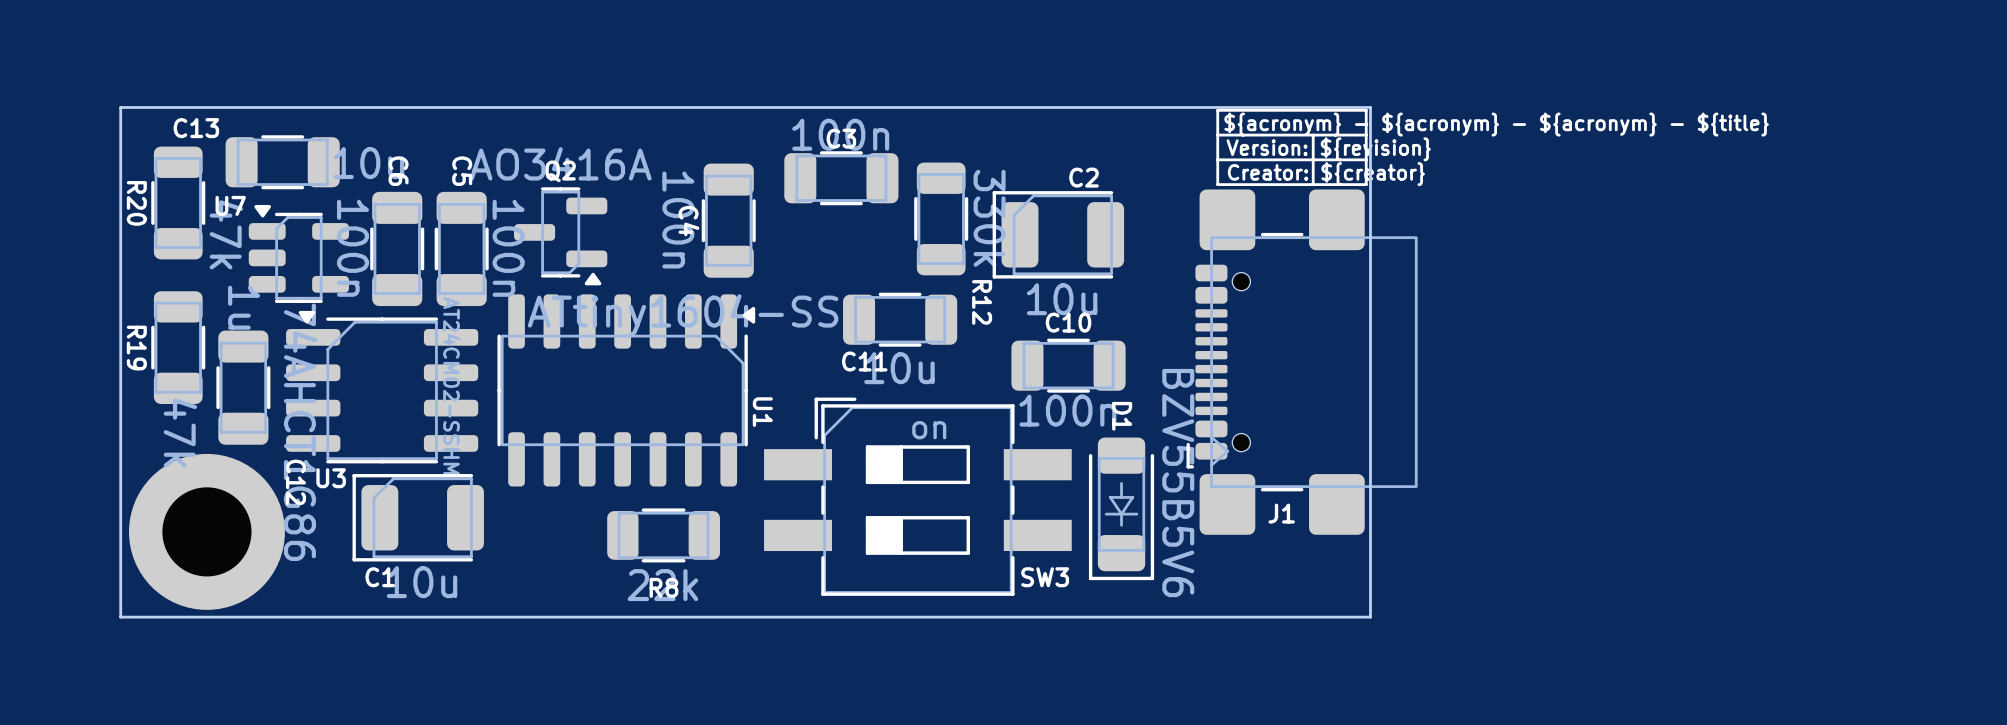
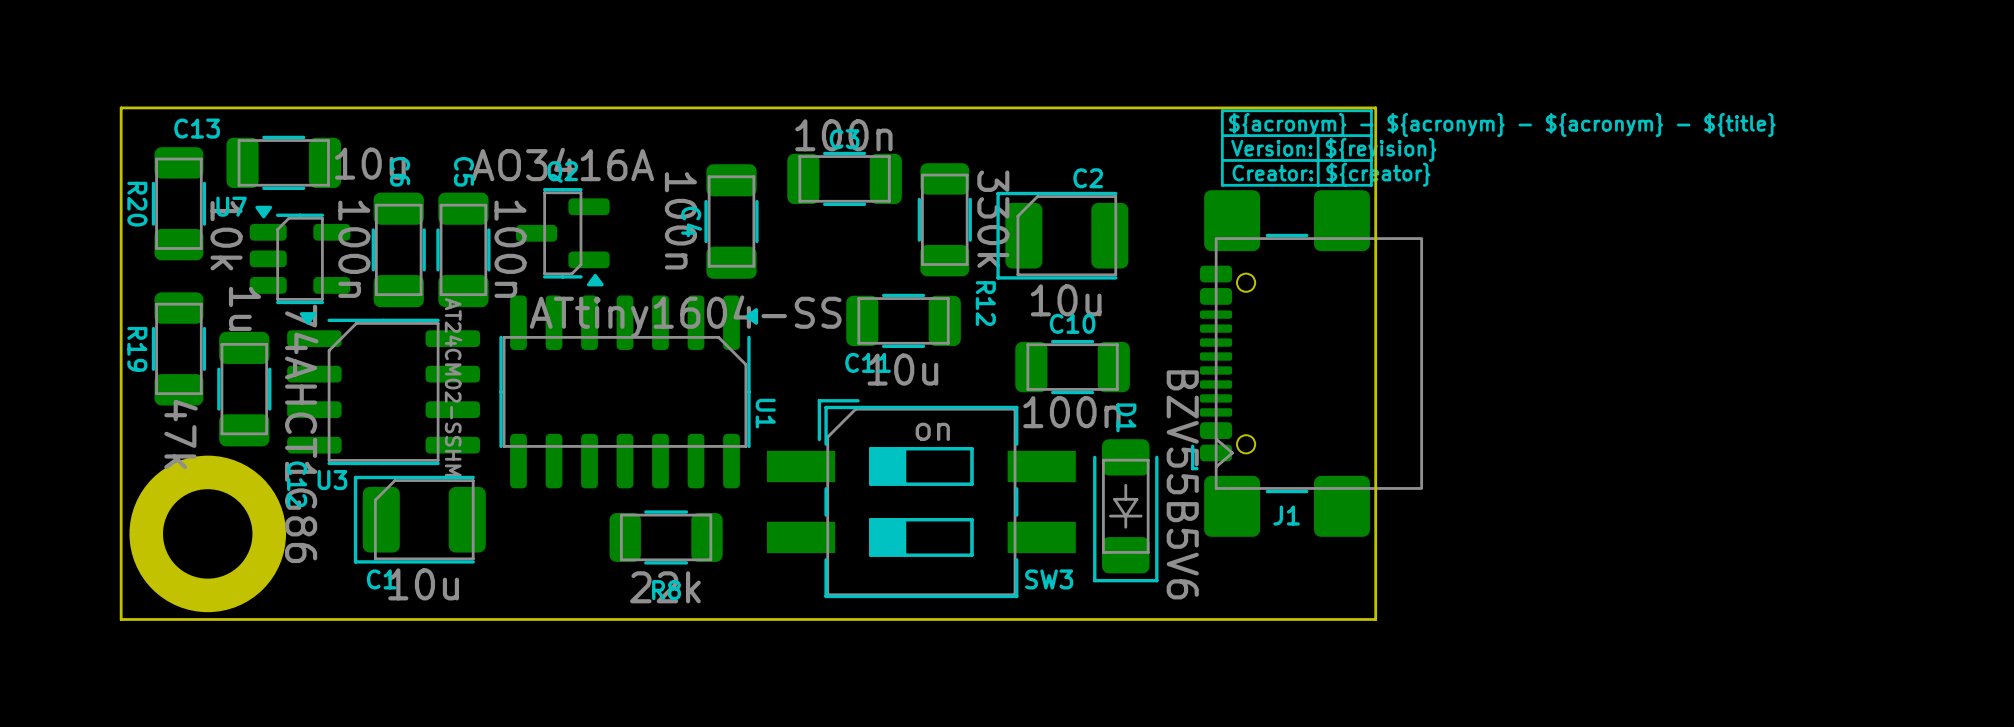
R20 value: 47k (226, 234) -> 10k (226, 235)

